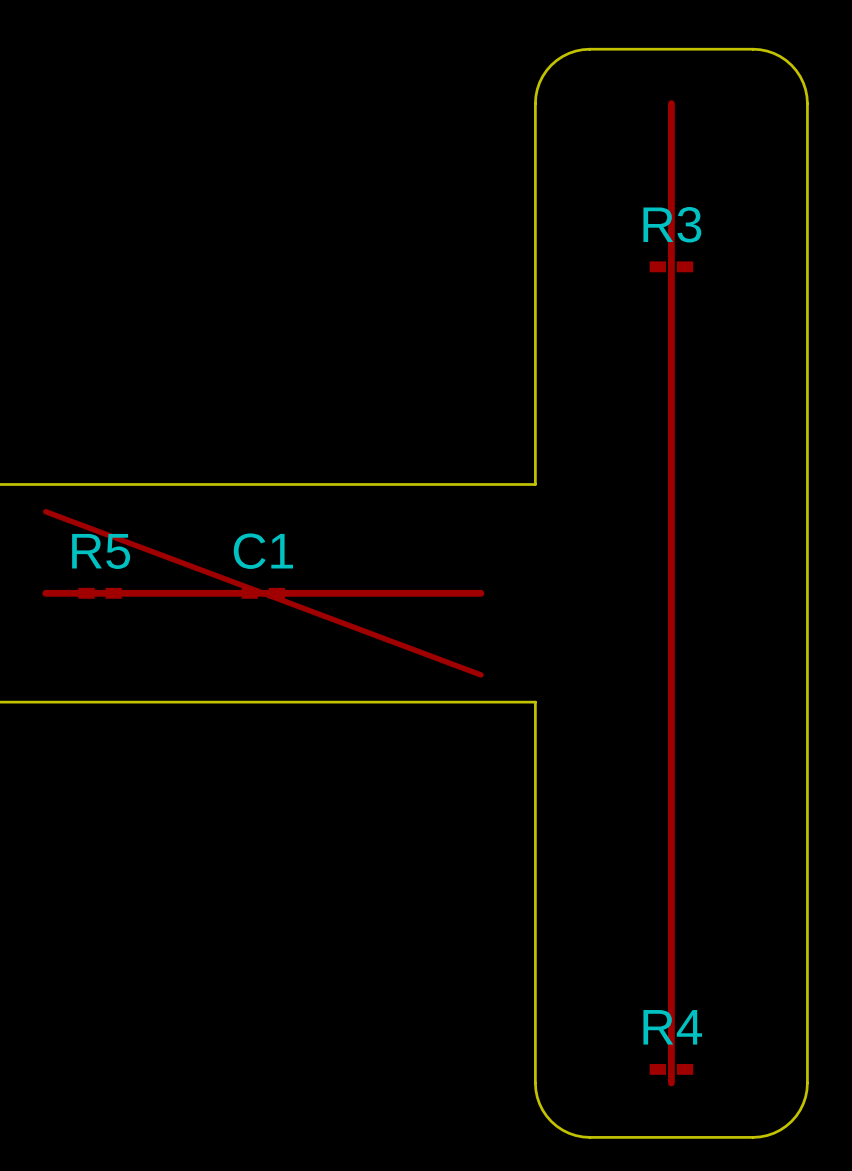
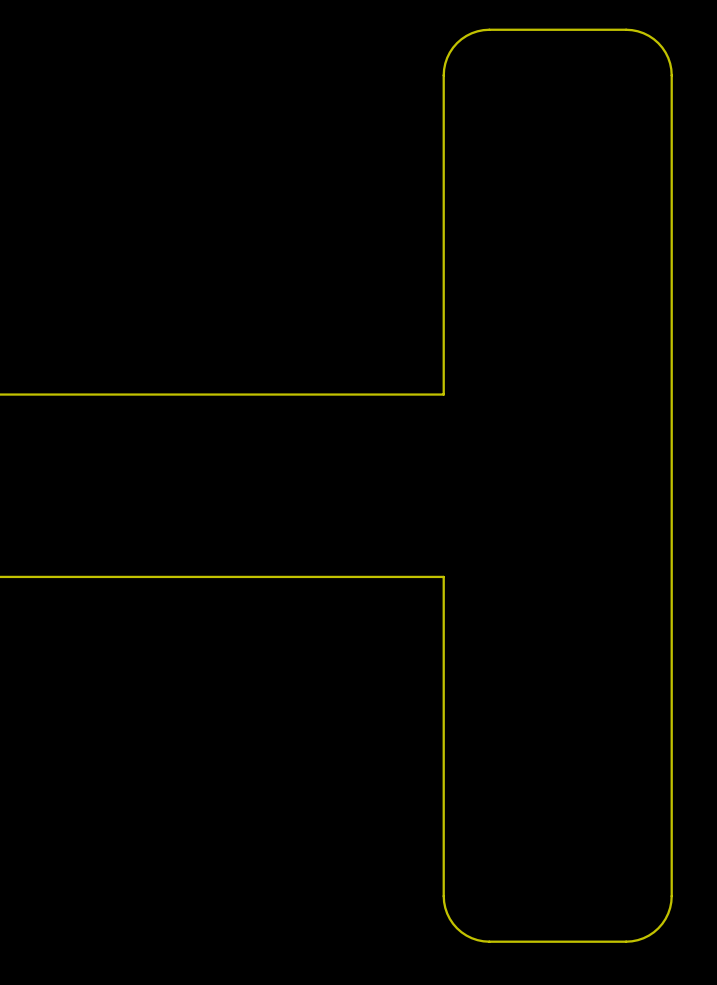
track: (671, 103) (671, 1082) -> none
R3: (671, 266) -> none
track: (45, 511) (480, 674) -> none
track: (45, 593) (480, 593) -> none
R5: (100, 593) -> none
C1: (263, 593) -> none
R4: (671, 1069) -> none

